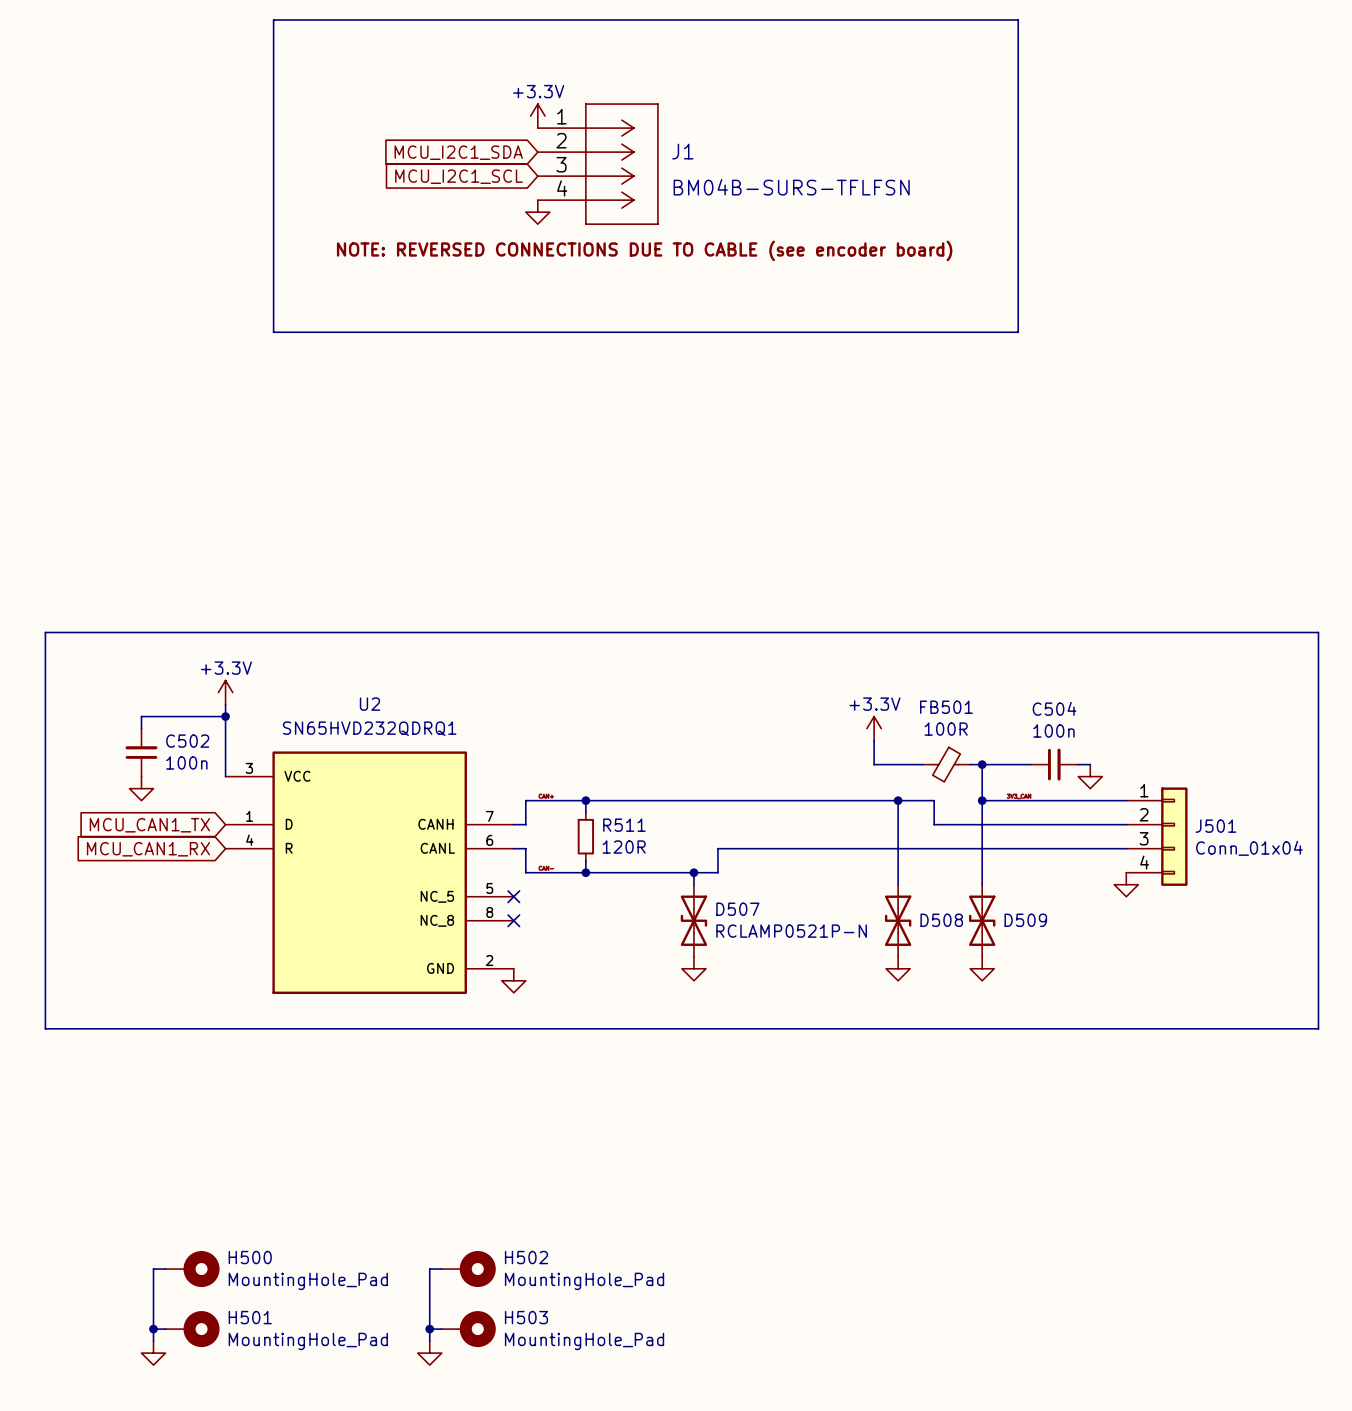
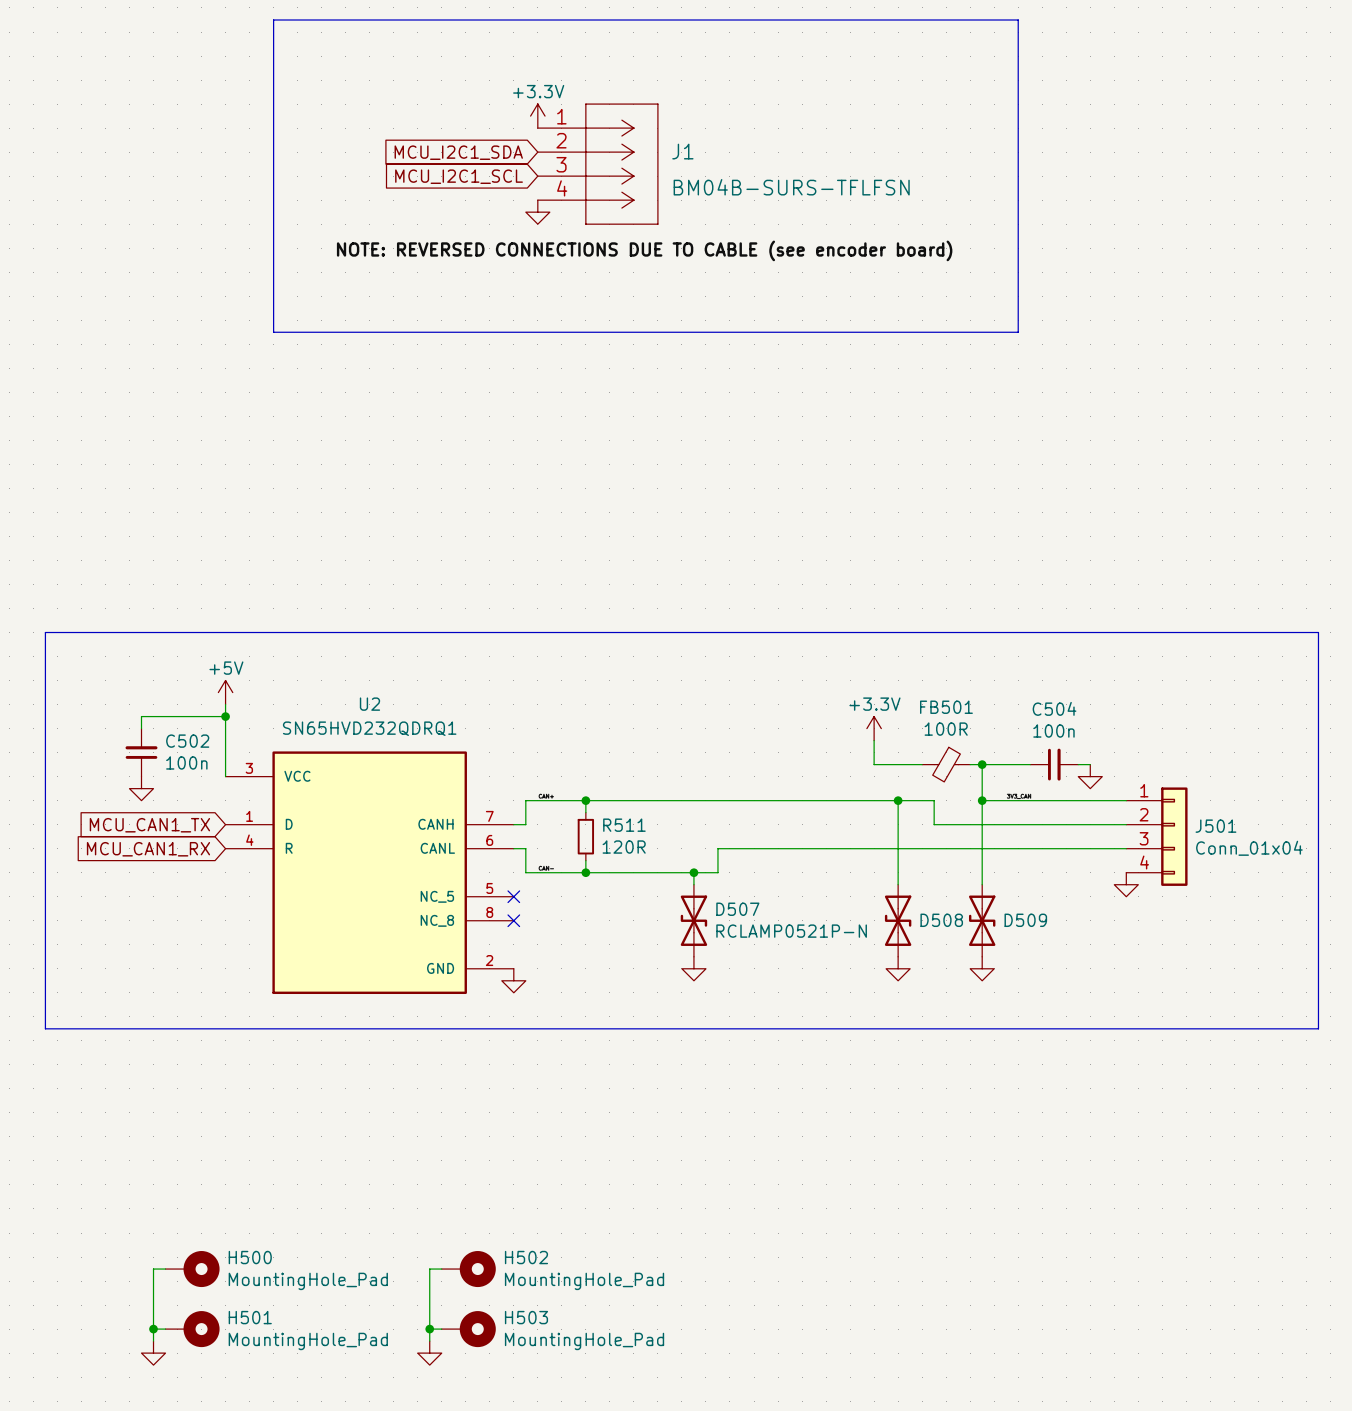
power symbol: +3.3V (225, 692) -> +5V (225, 692)

